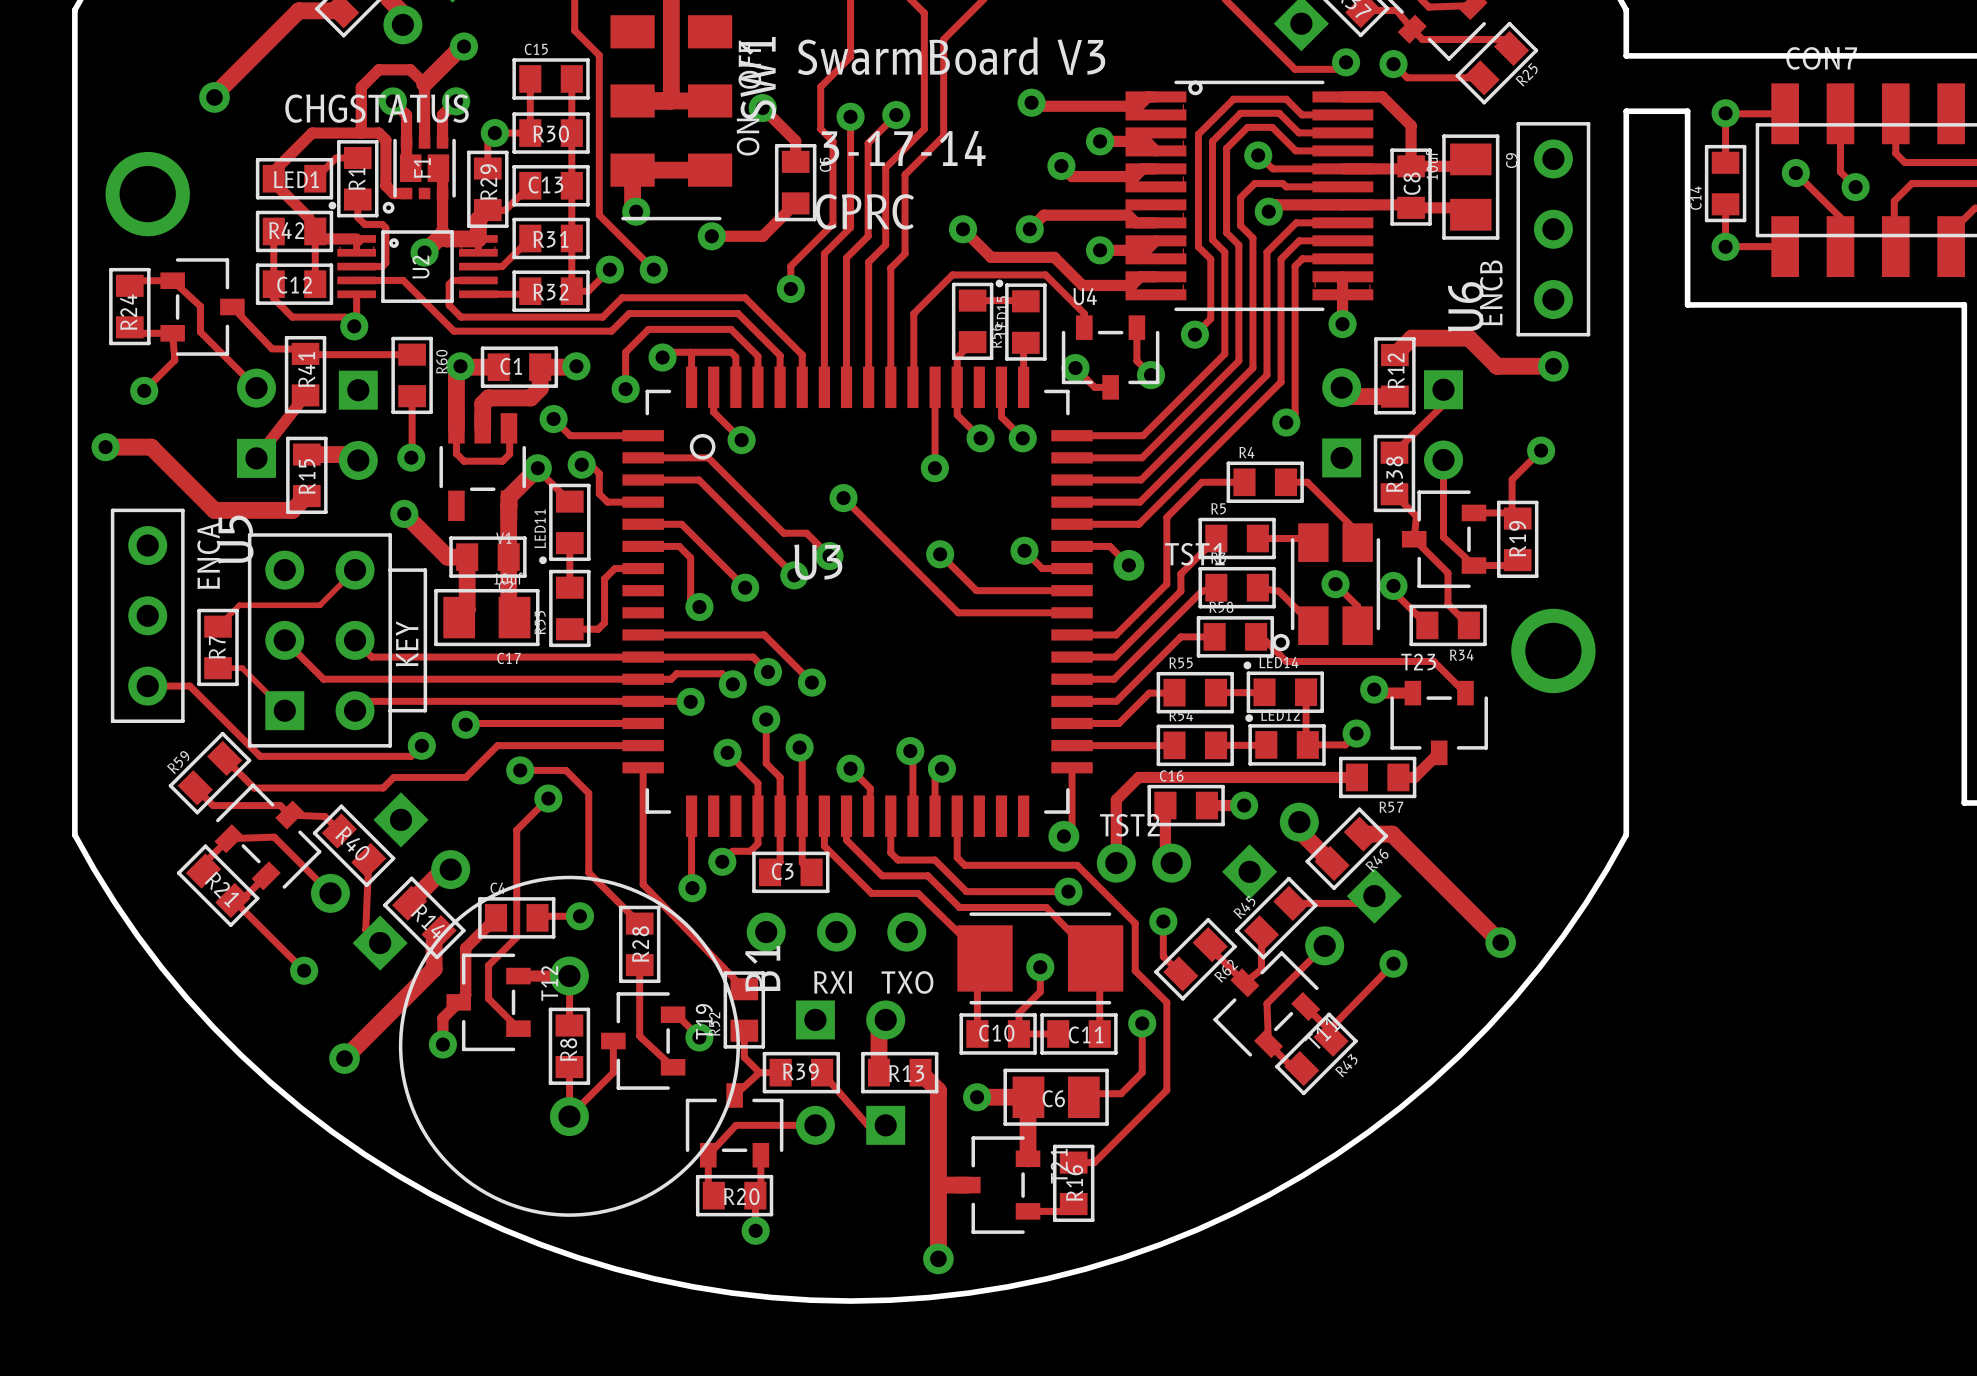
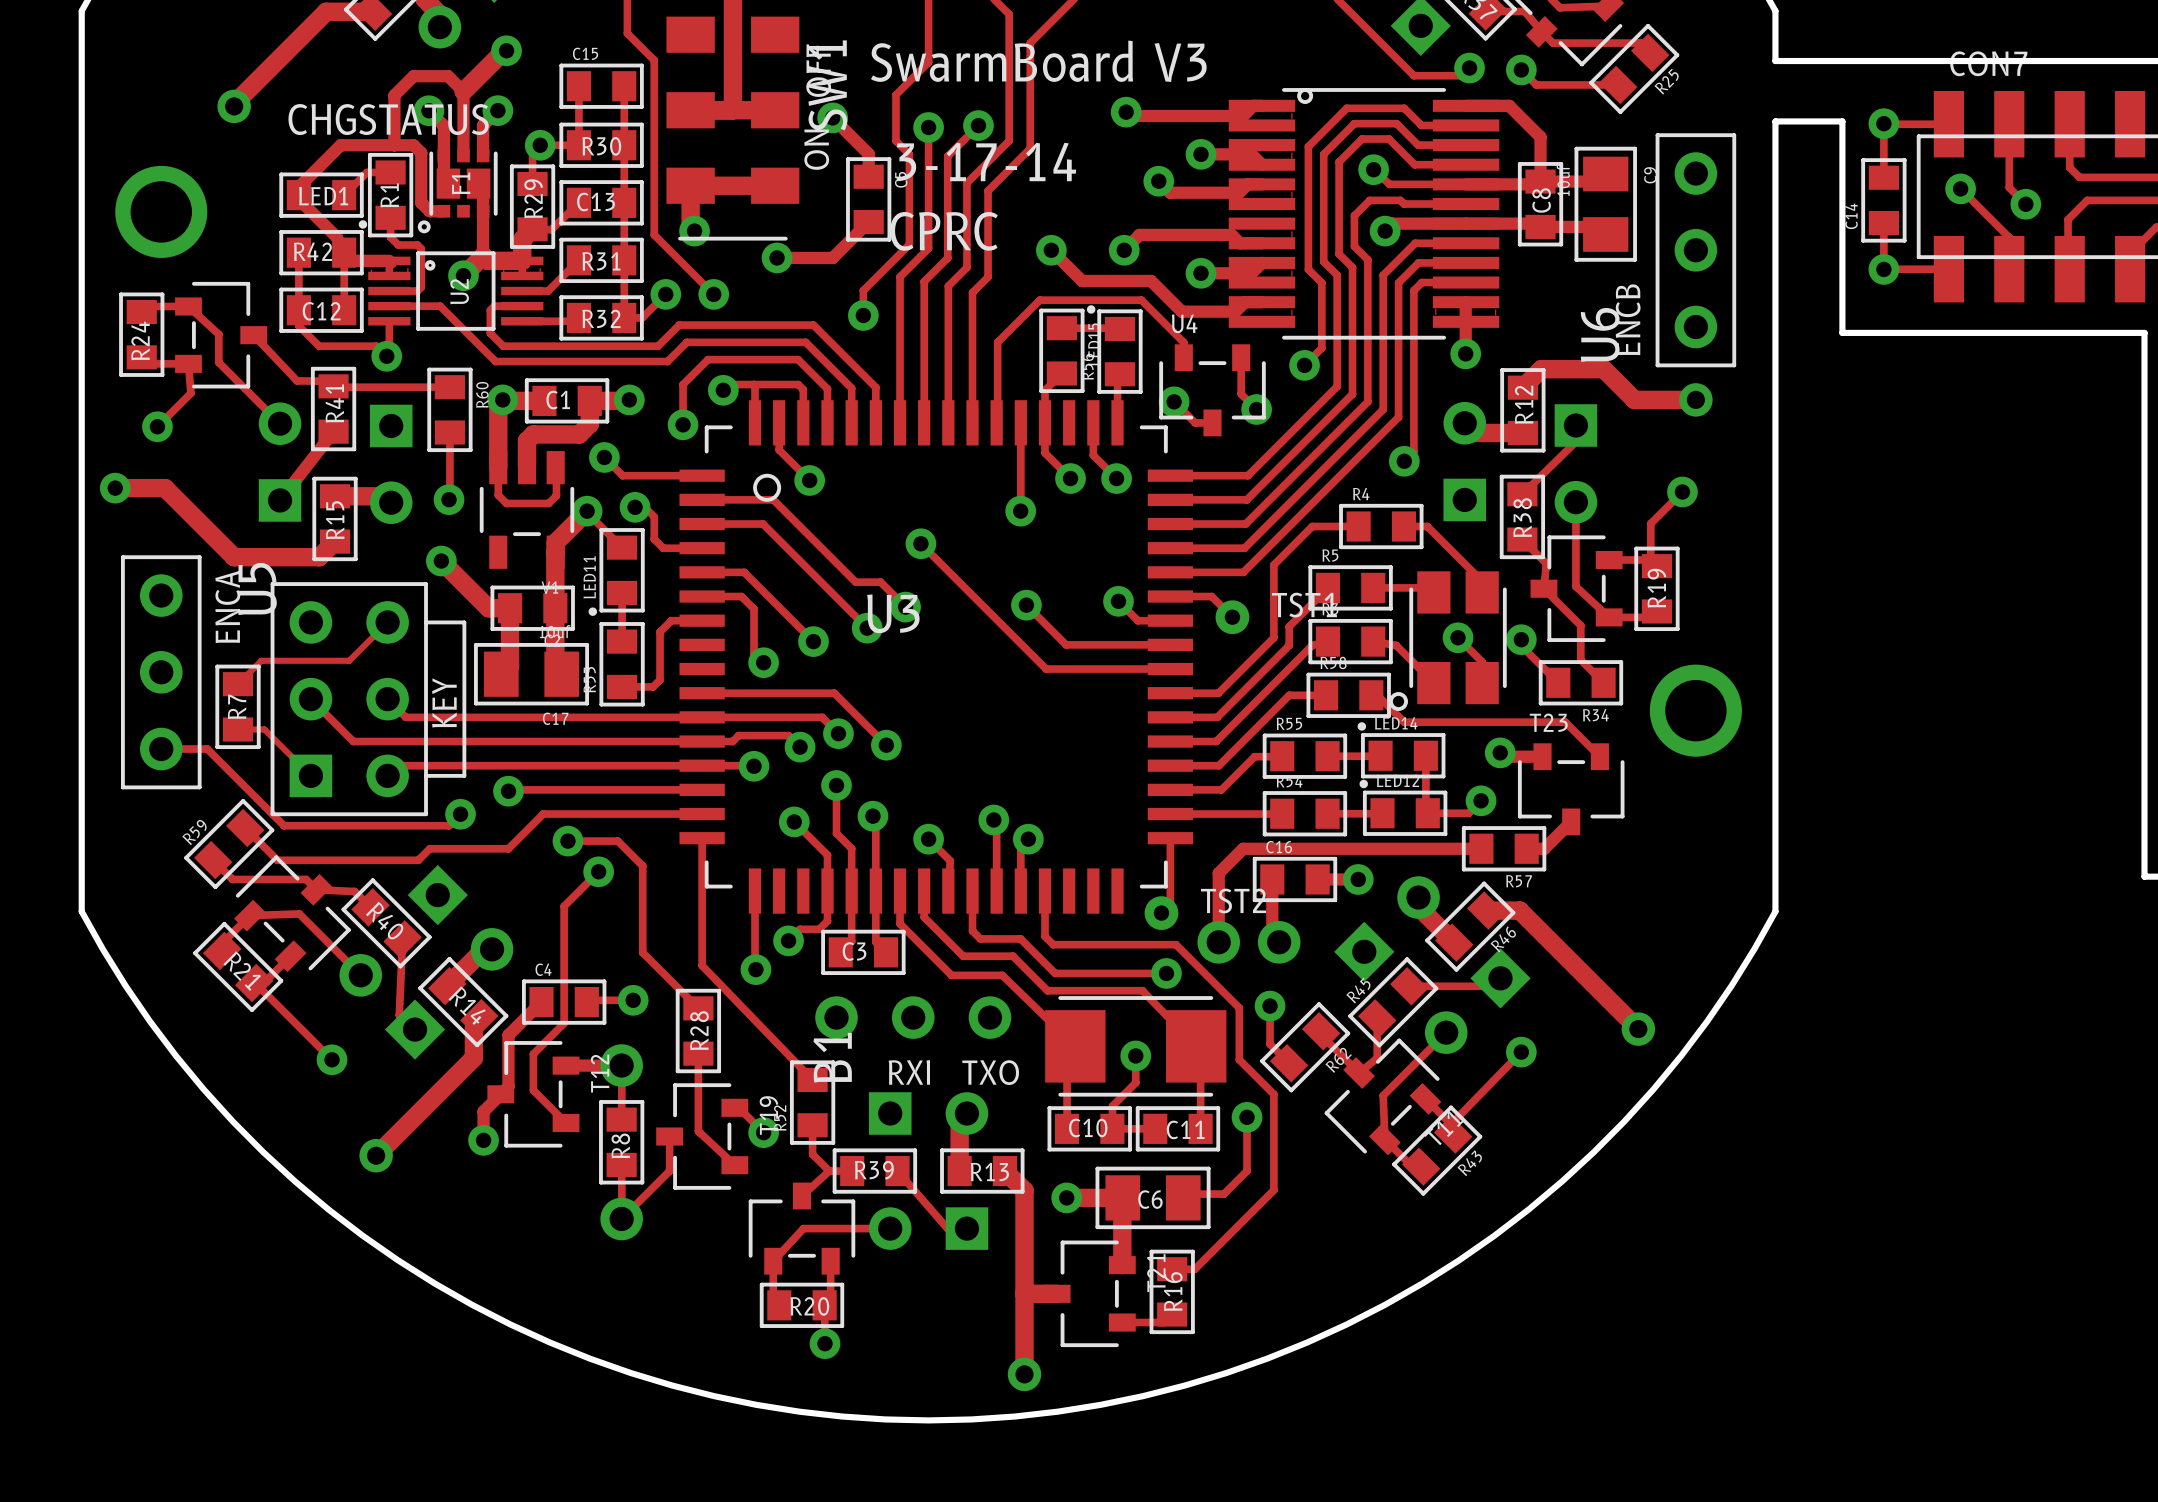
text position: CHGSTATUS (377, 108) -> CHGSTATUS (388, 119)
B1 footprint: [398, 875, 740, 1217] -> [600, 1044, 643, 1241]

